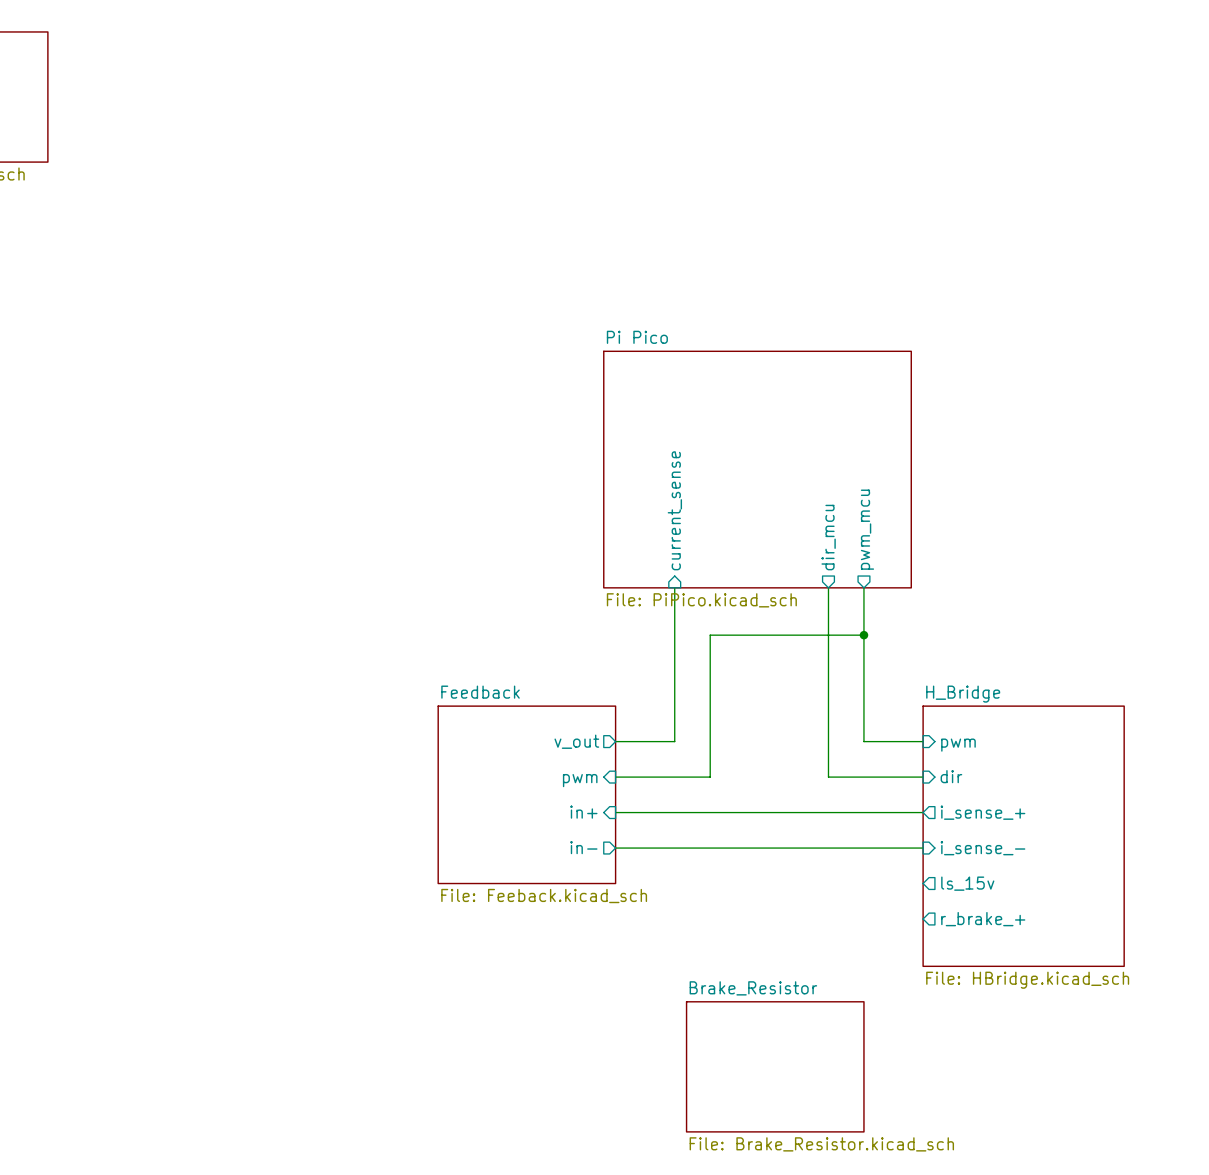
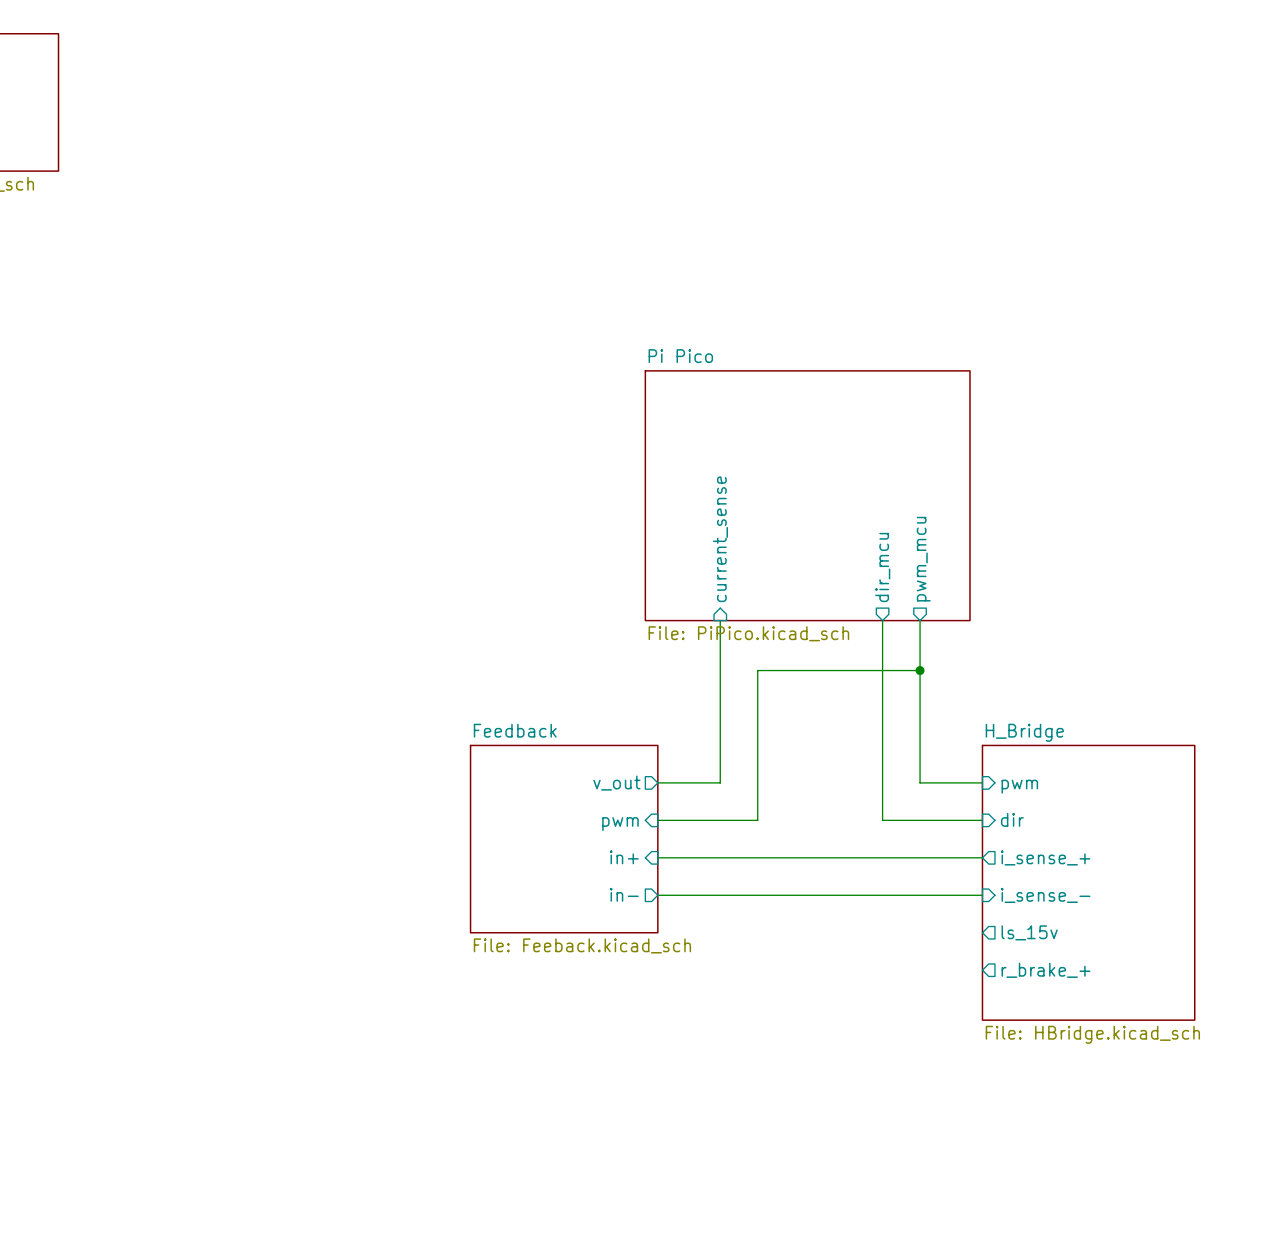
sheet Brake_Resistor: File: Brake_Resistor.kicad_sch (775, 1066) -> none

